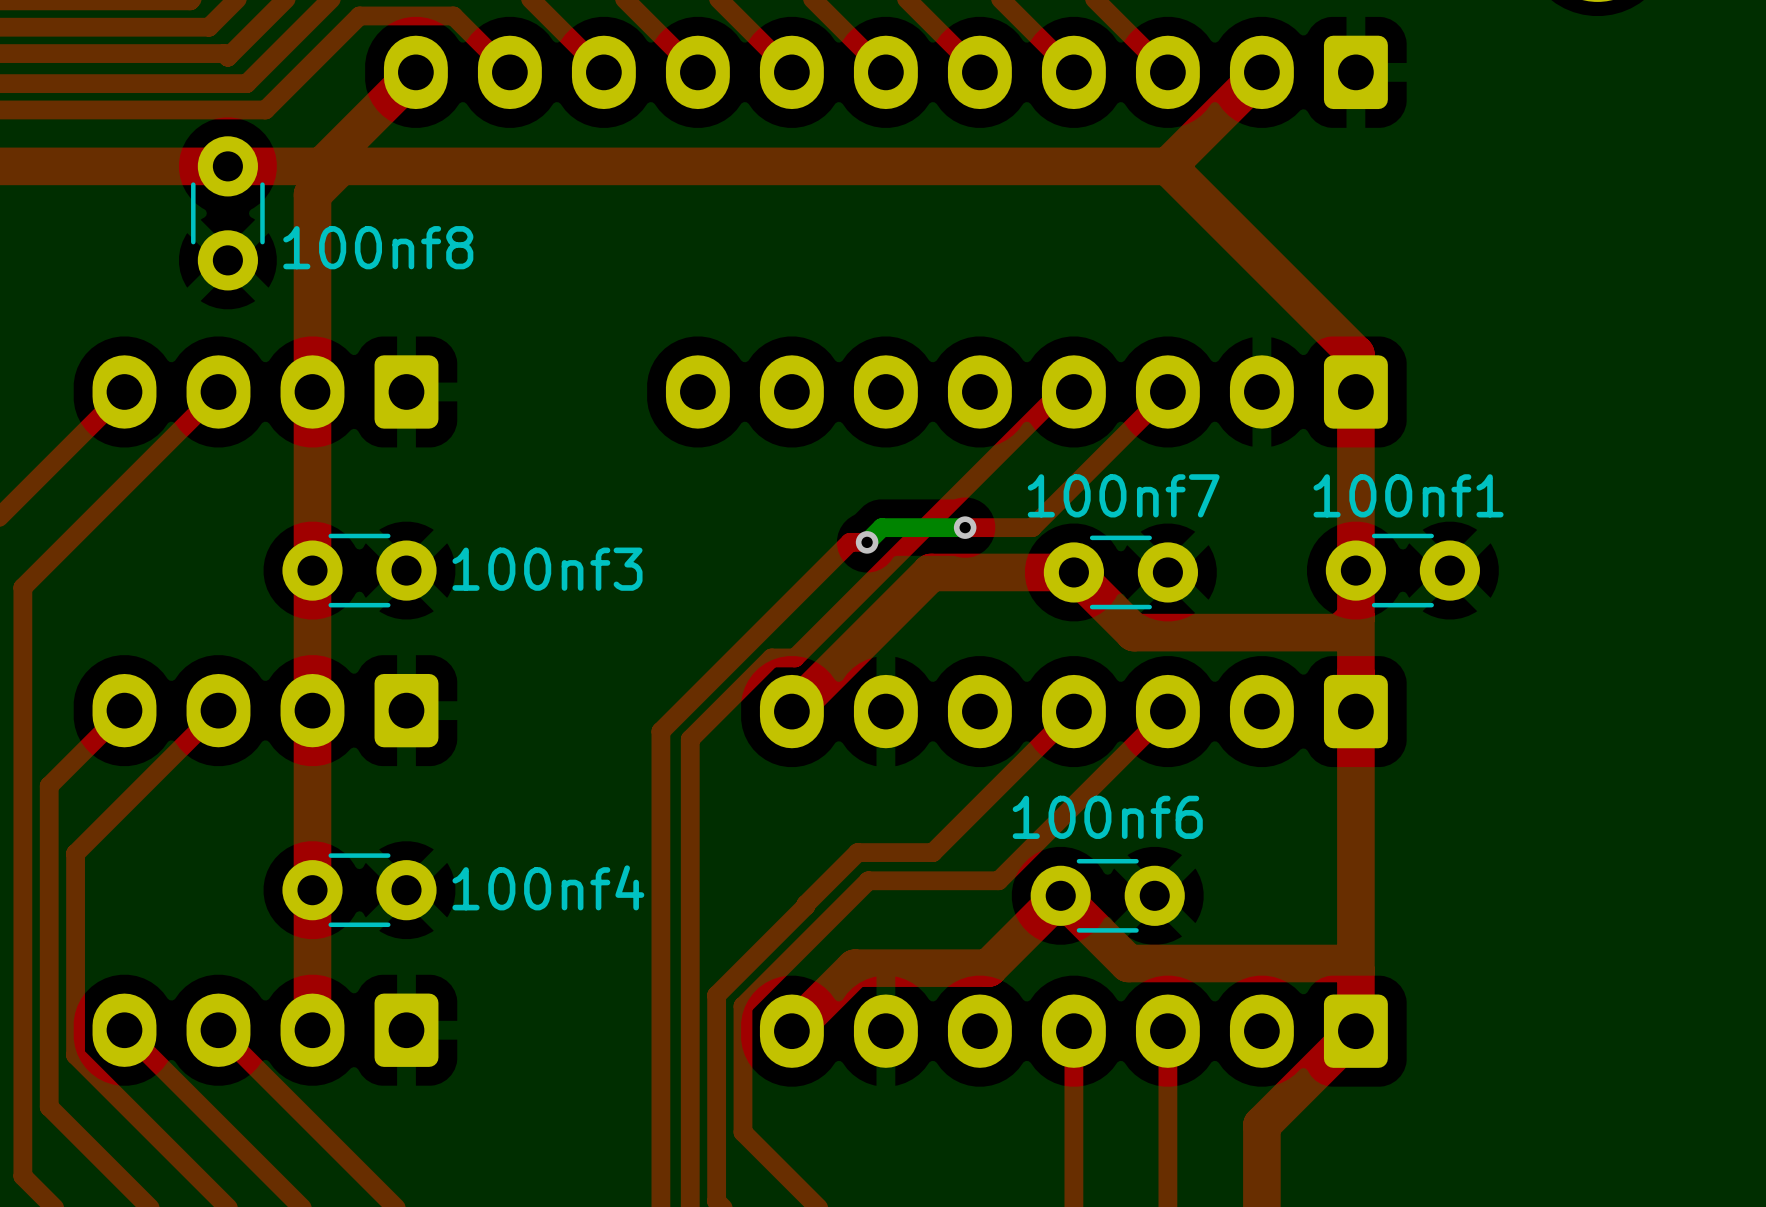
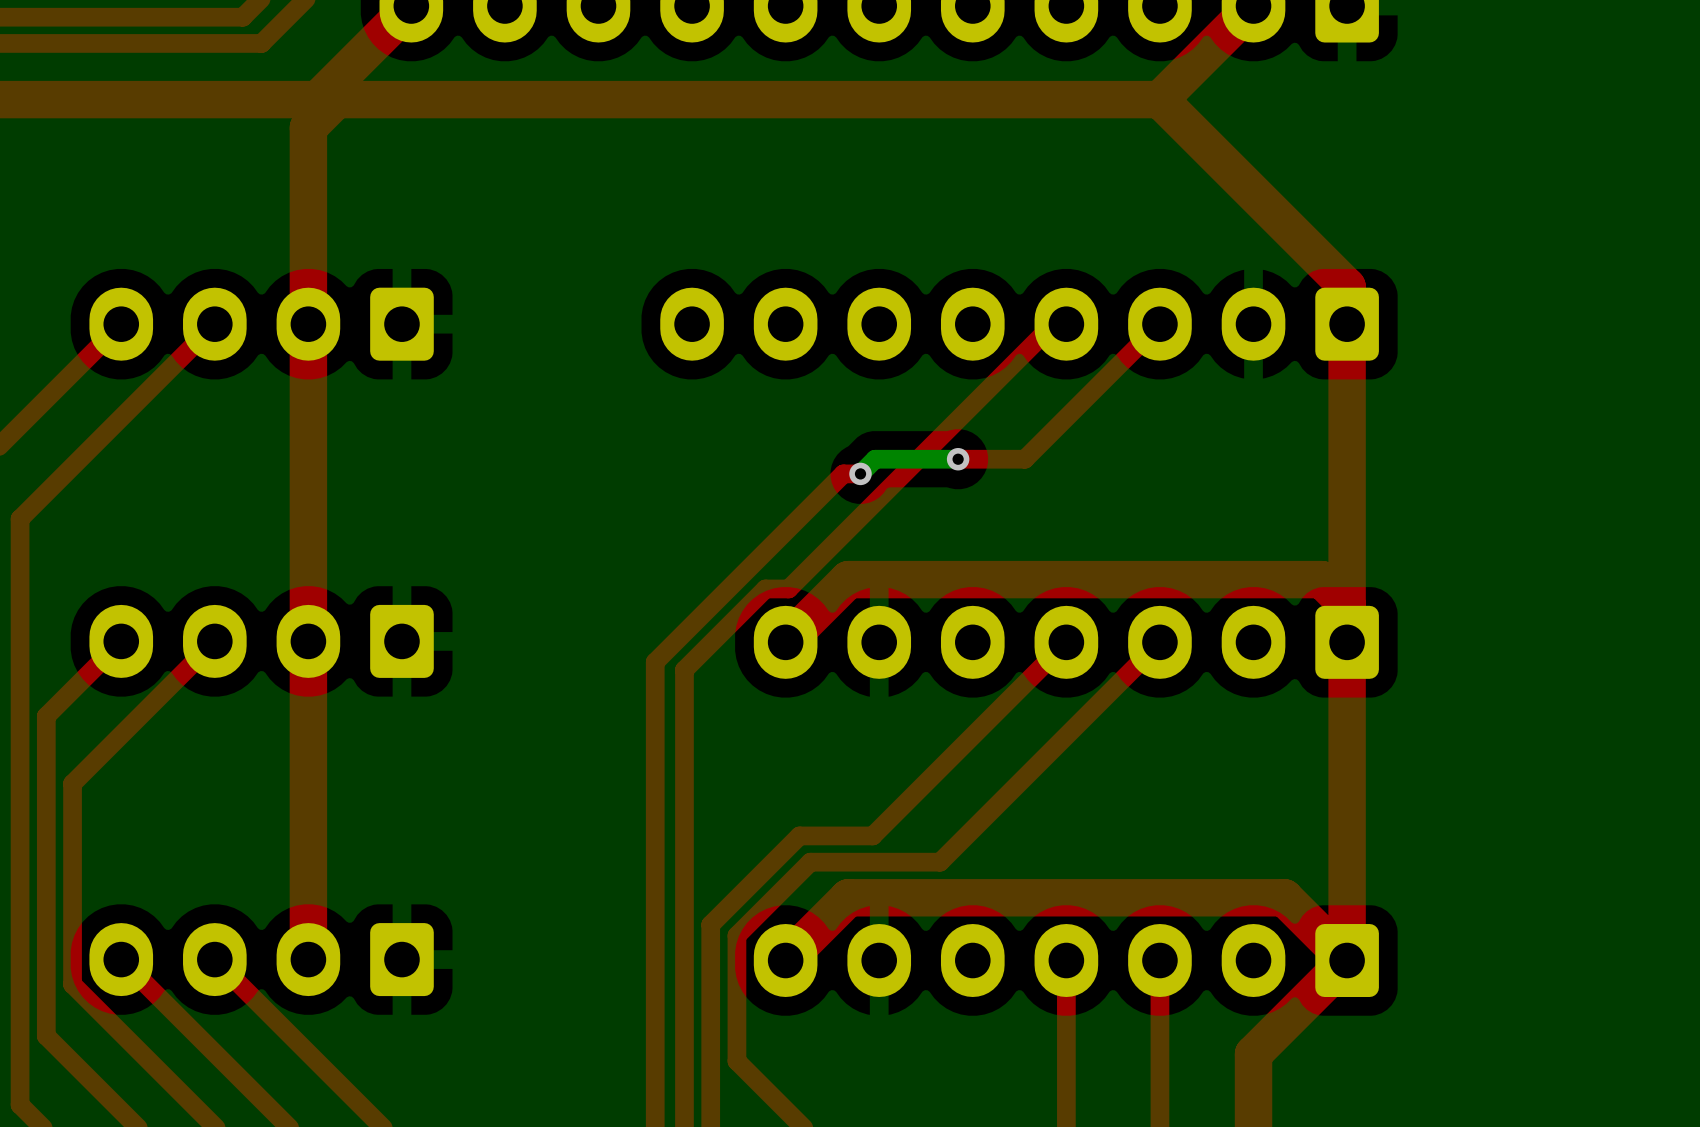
100nf8: (227, 213) -> none
100nf3: (359, 570) -> none
100nf1: (1402, 570) -> none
100nf7: (1120, 572) -> none
top track: (1355, 617) (1340, 632) (1134, 632) (1073, 572) (931, 572) (854, 648) -> (1347, 604) (1321, 579) (848, 579)
top track: (932, 852) (857, 852) (805, 906) -> (926, 782) (872, 835) (799, 835)
top track: (998, 880) (868, 880) (816, 932) -> (991, 810) (940, 862) (810, 862)
100nf4: (359, 890) -> none
100nf6: (1107, 895) -> none
top track: (988, 968) (1060, 895) (1128, 963) (1348, 963) (1355, 971) -> (981, 897) (1284, 897) (1347, 960)

